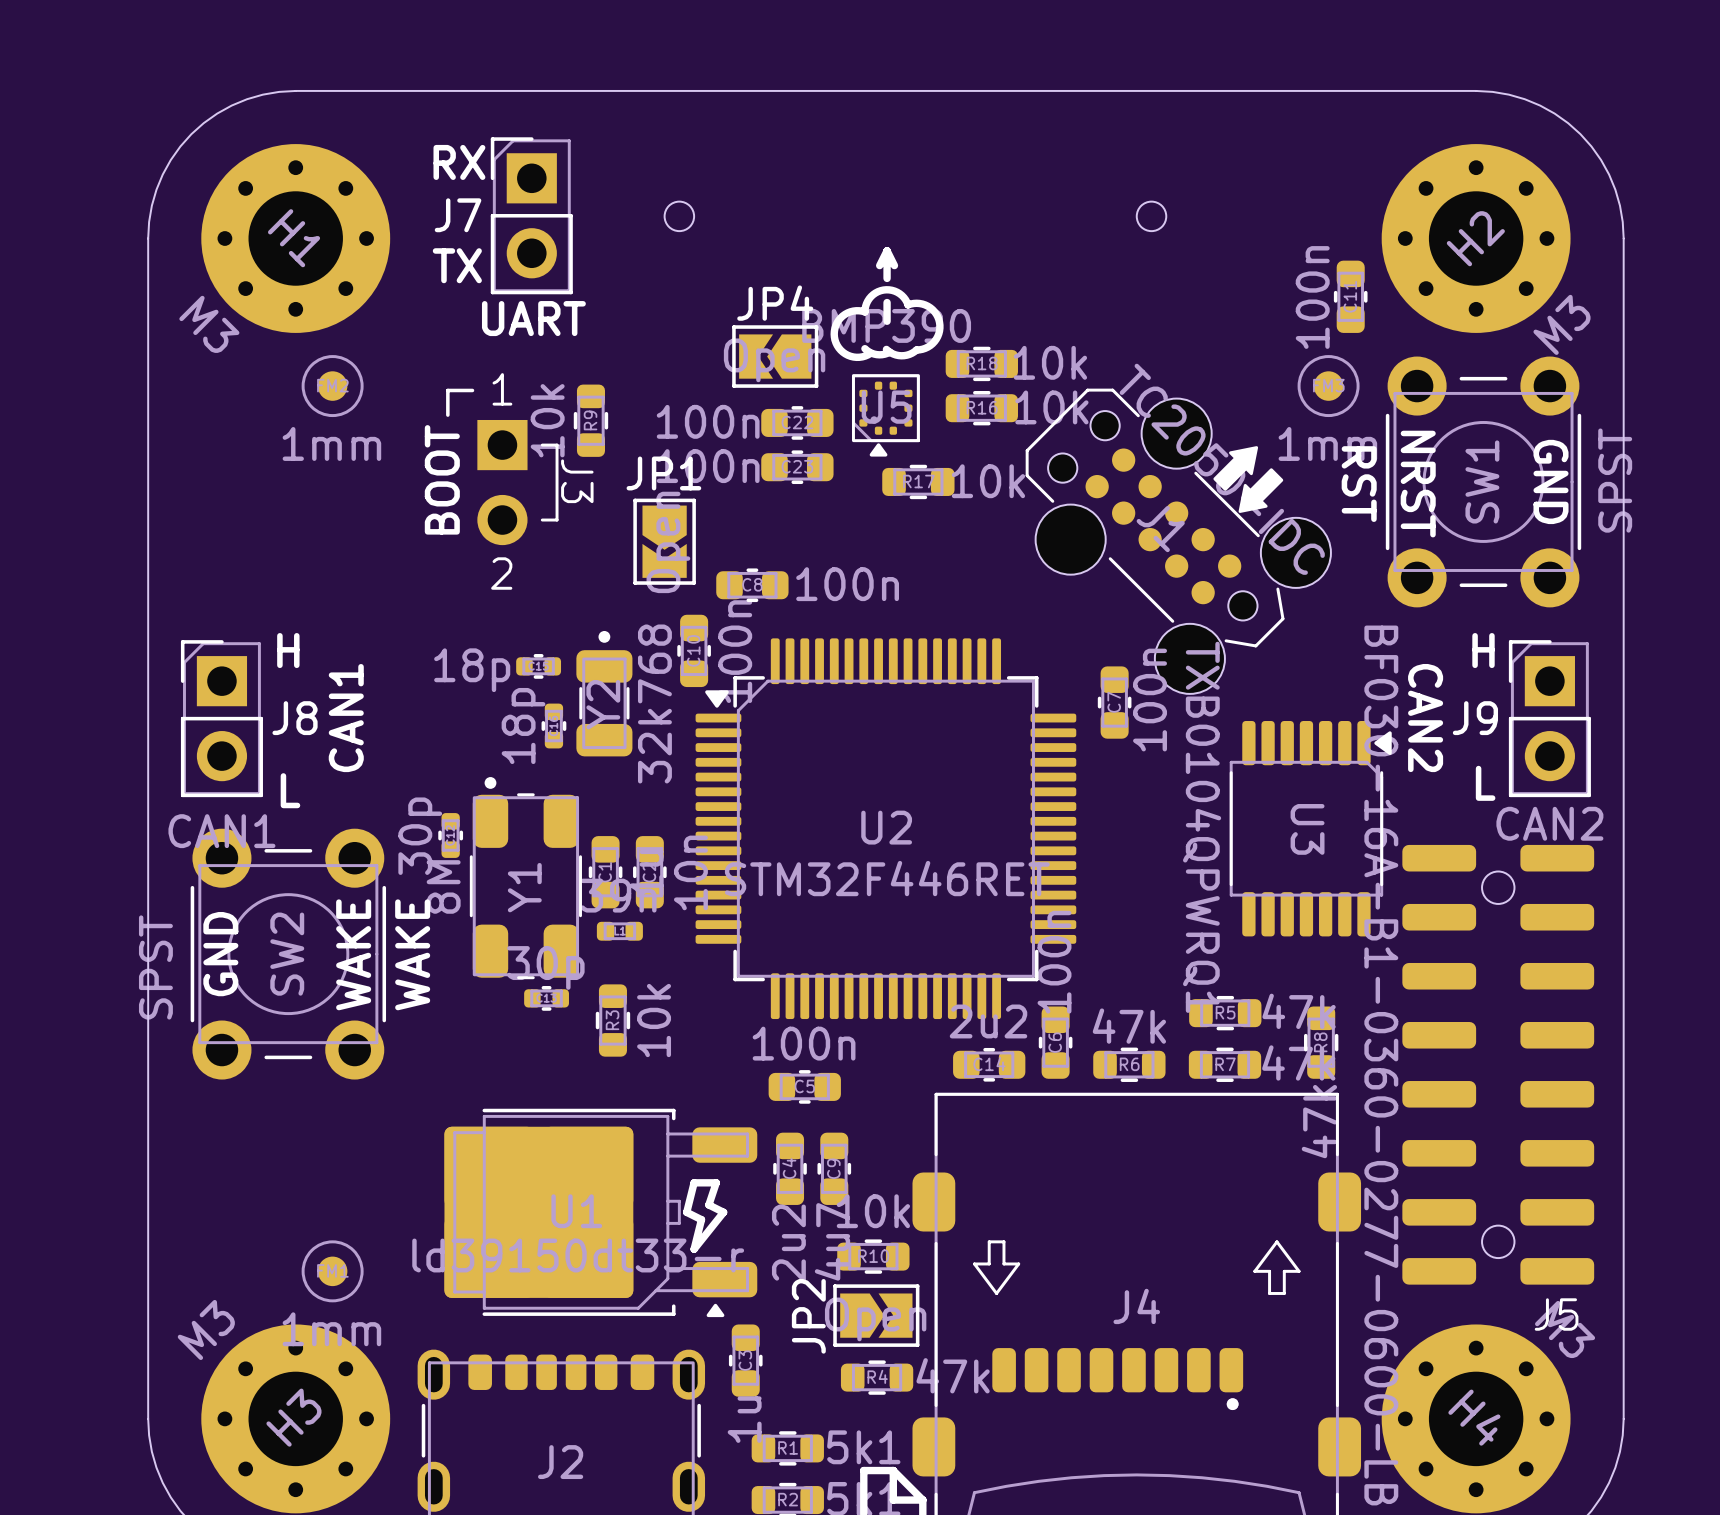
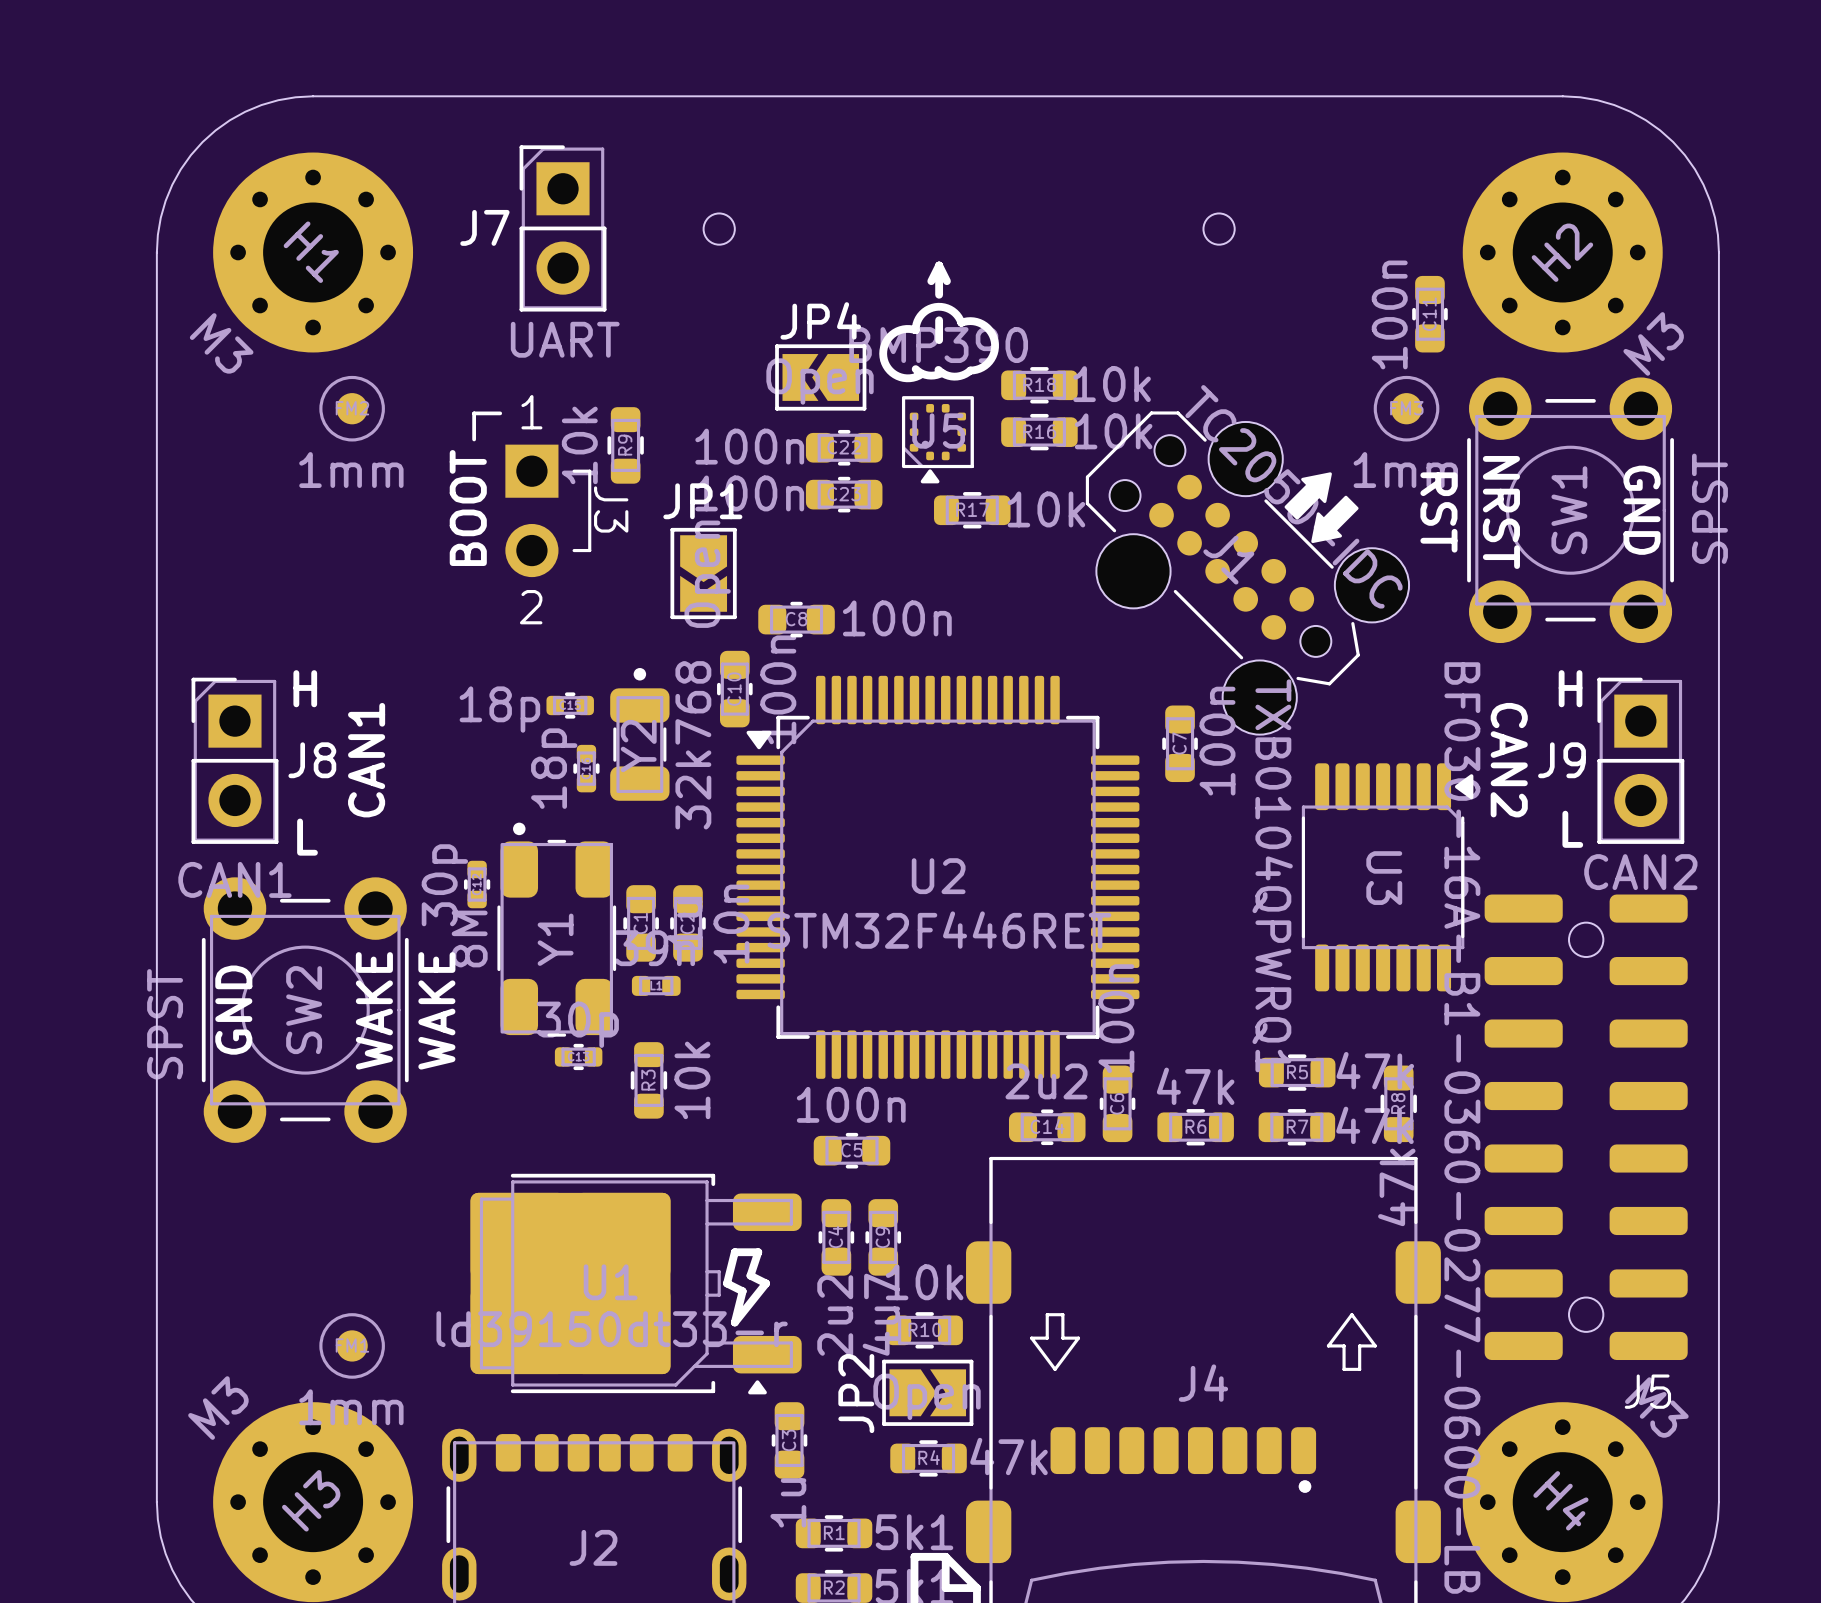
text: RX (459, 162) -> none
text: TX (457, 265) -> none
text: UART (533, 318) -> none
J7 value: none -> UART (565, 339)

